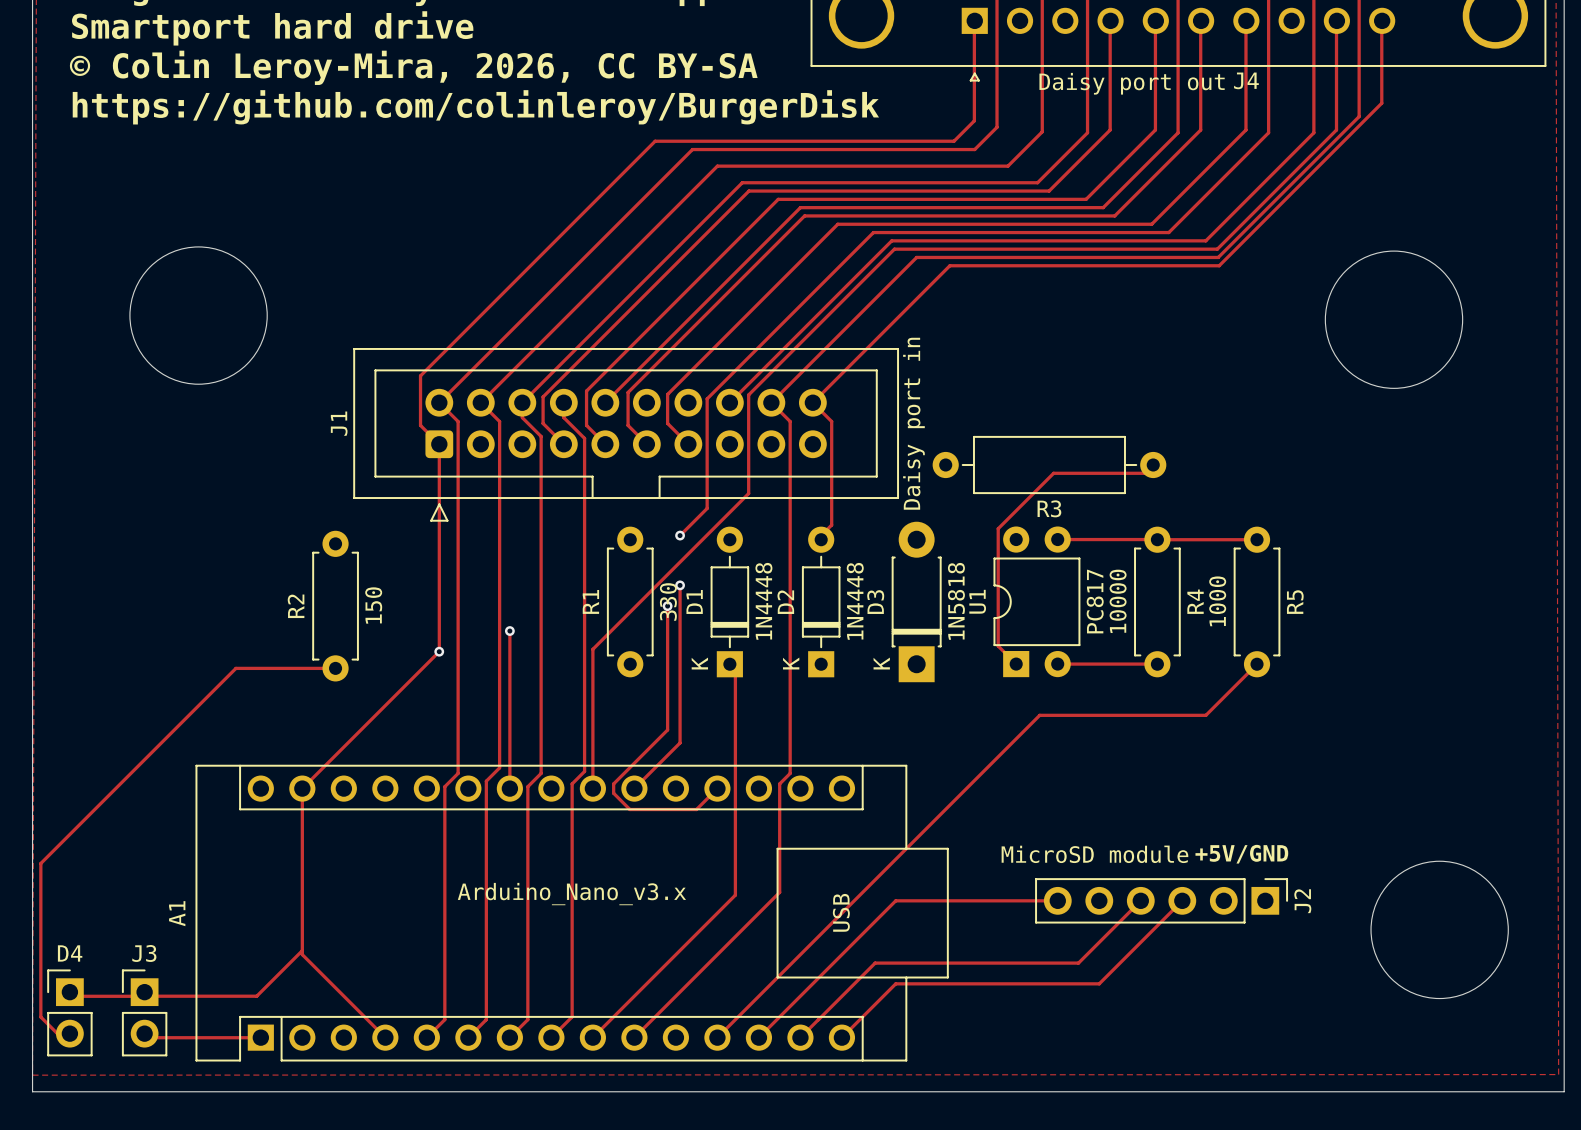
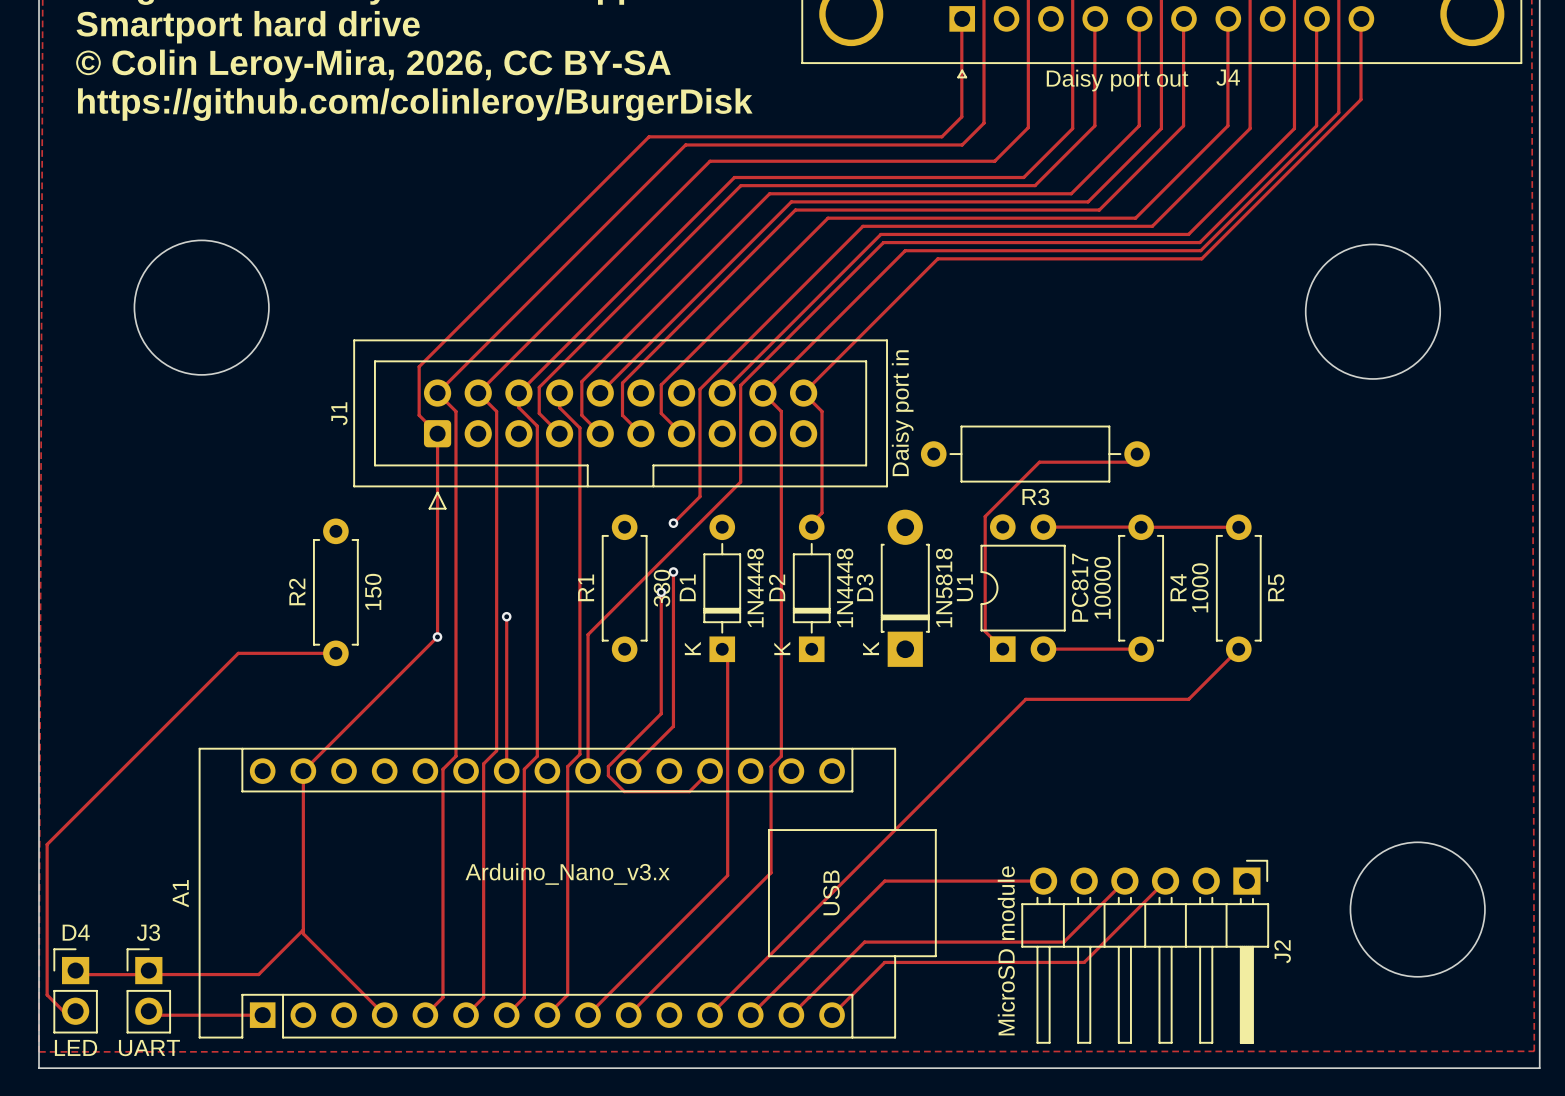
J2 value position: MicroSD module (1094, 854) -> MicroSD module (1006, 950)
text: +5V/GND (1241, 854) -> none
J2 footprint: [1035, 878, 1289, 924] -> [1021, 859, 1270, 1044]
D4 value: none -> LED (76, 1047)
J3 value: none -> UART (149, 1048)

